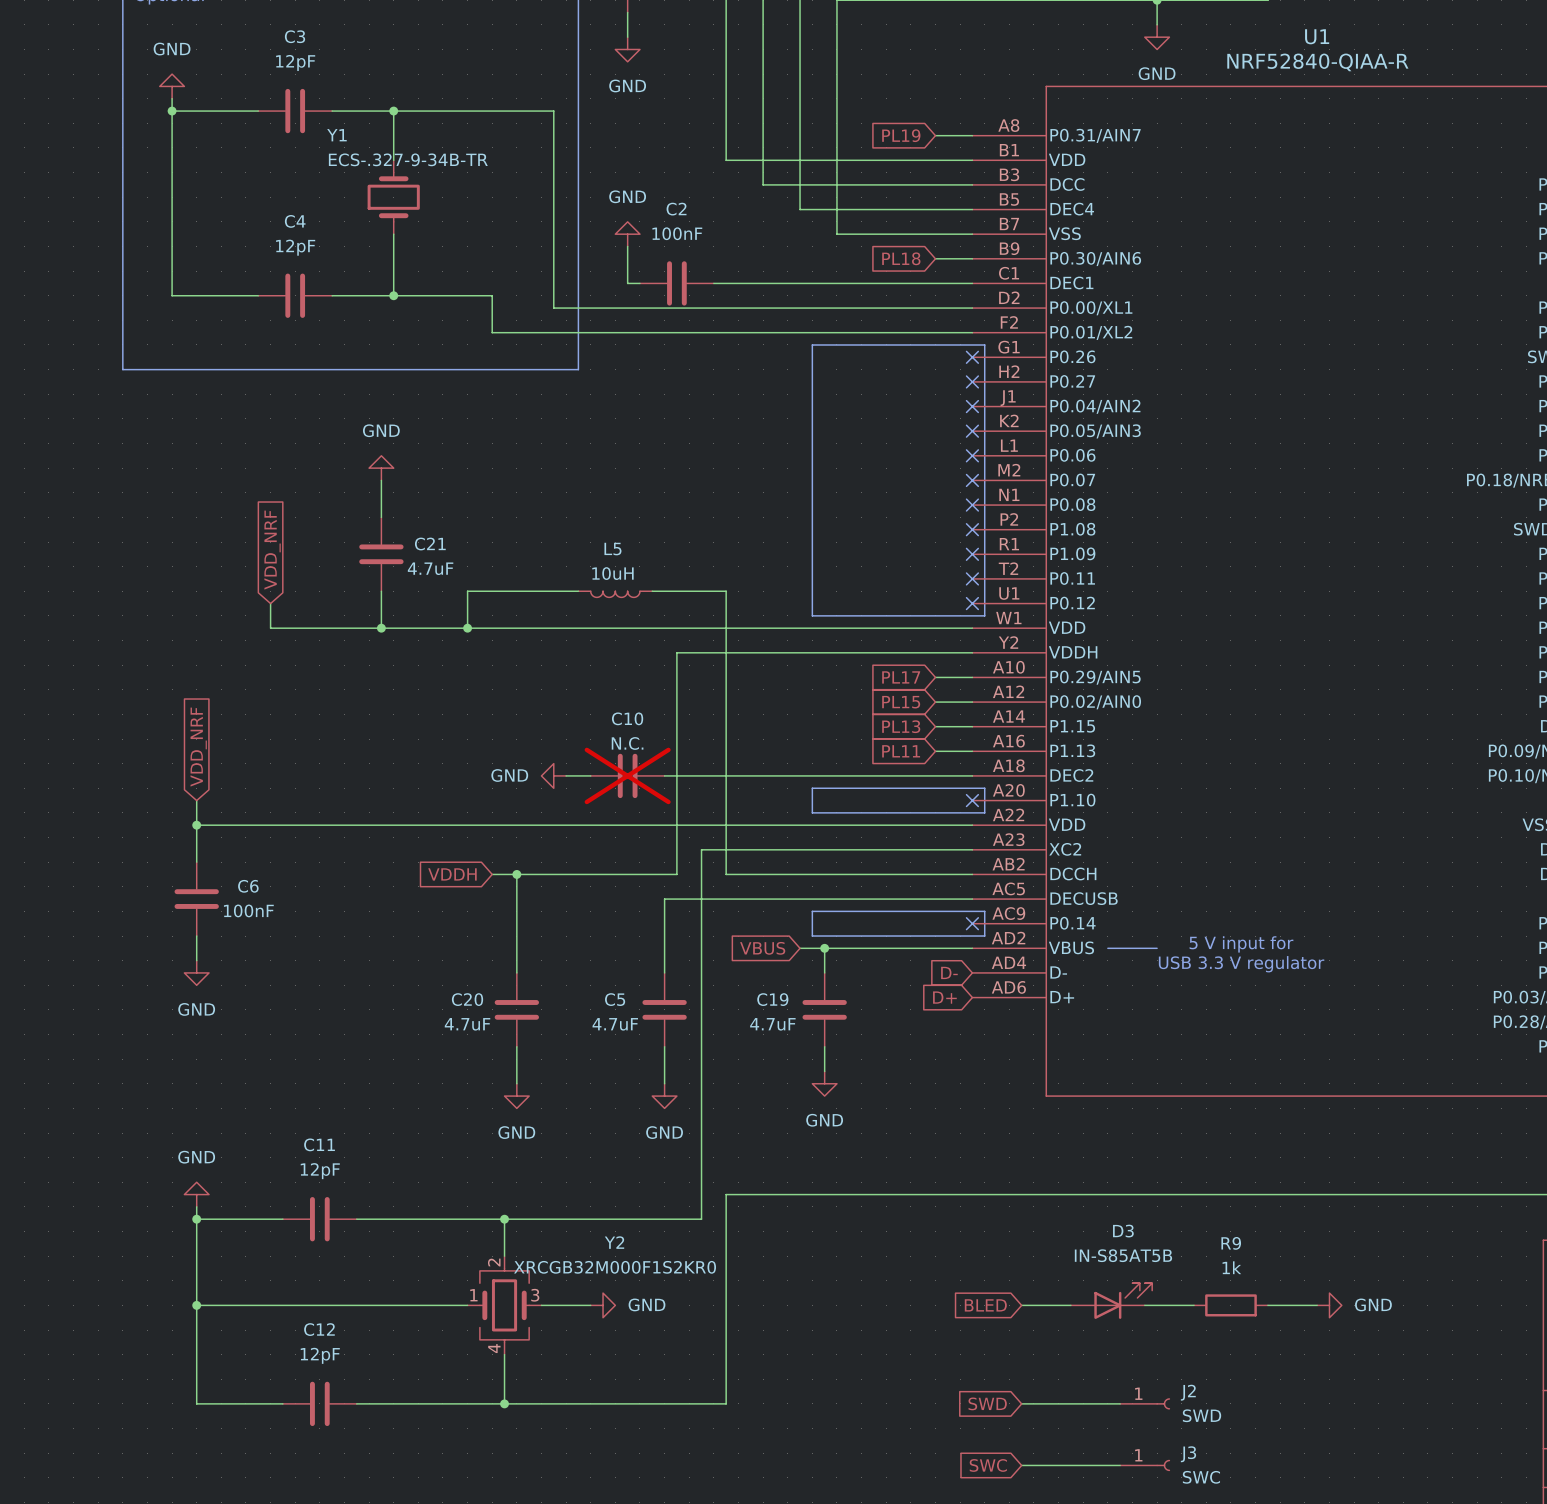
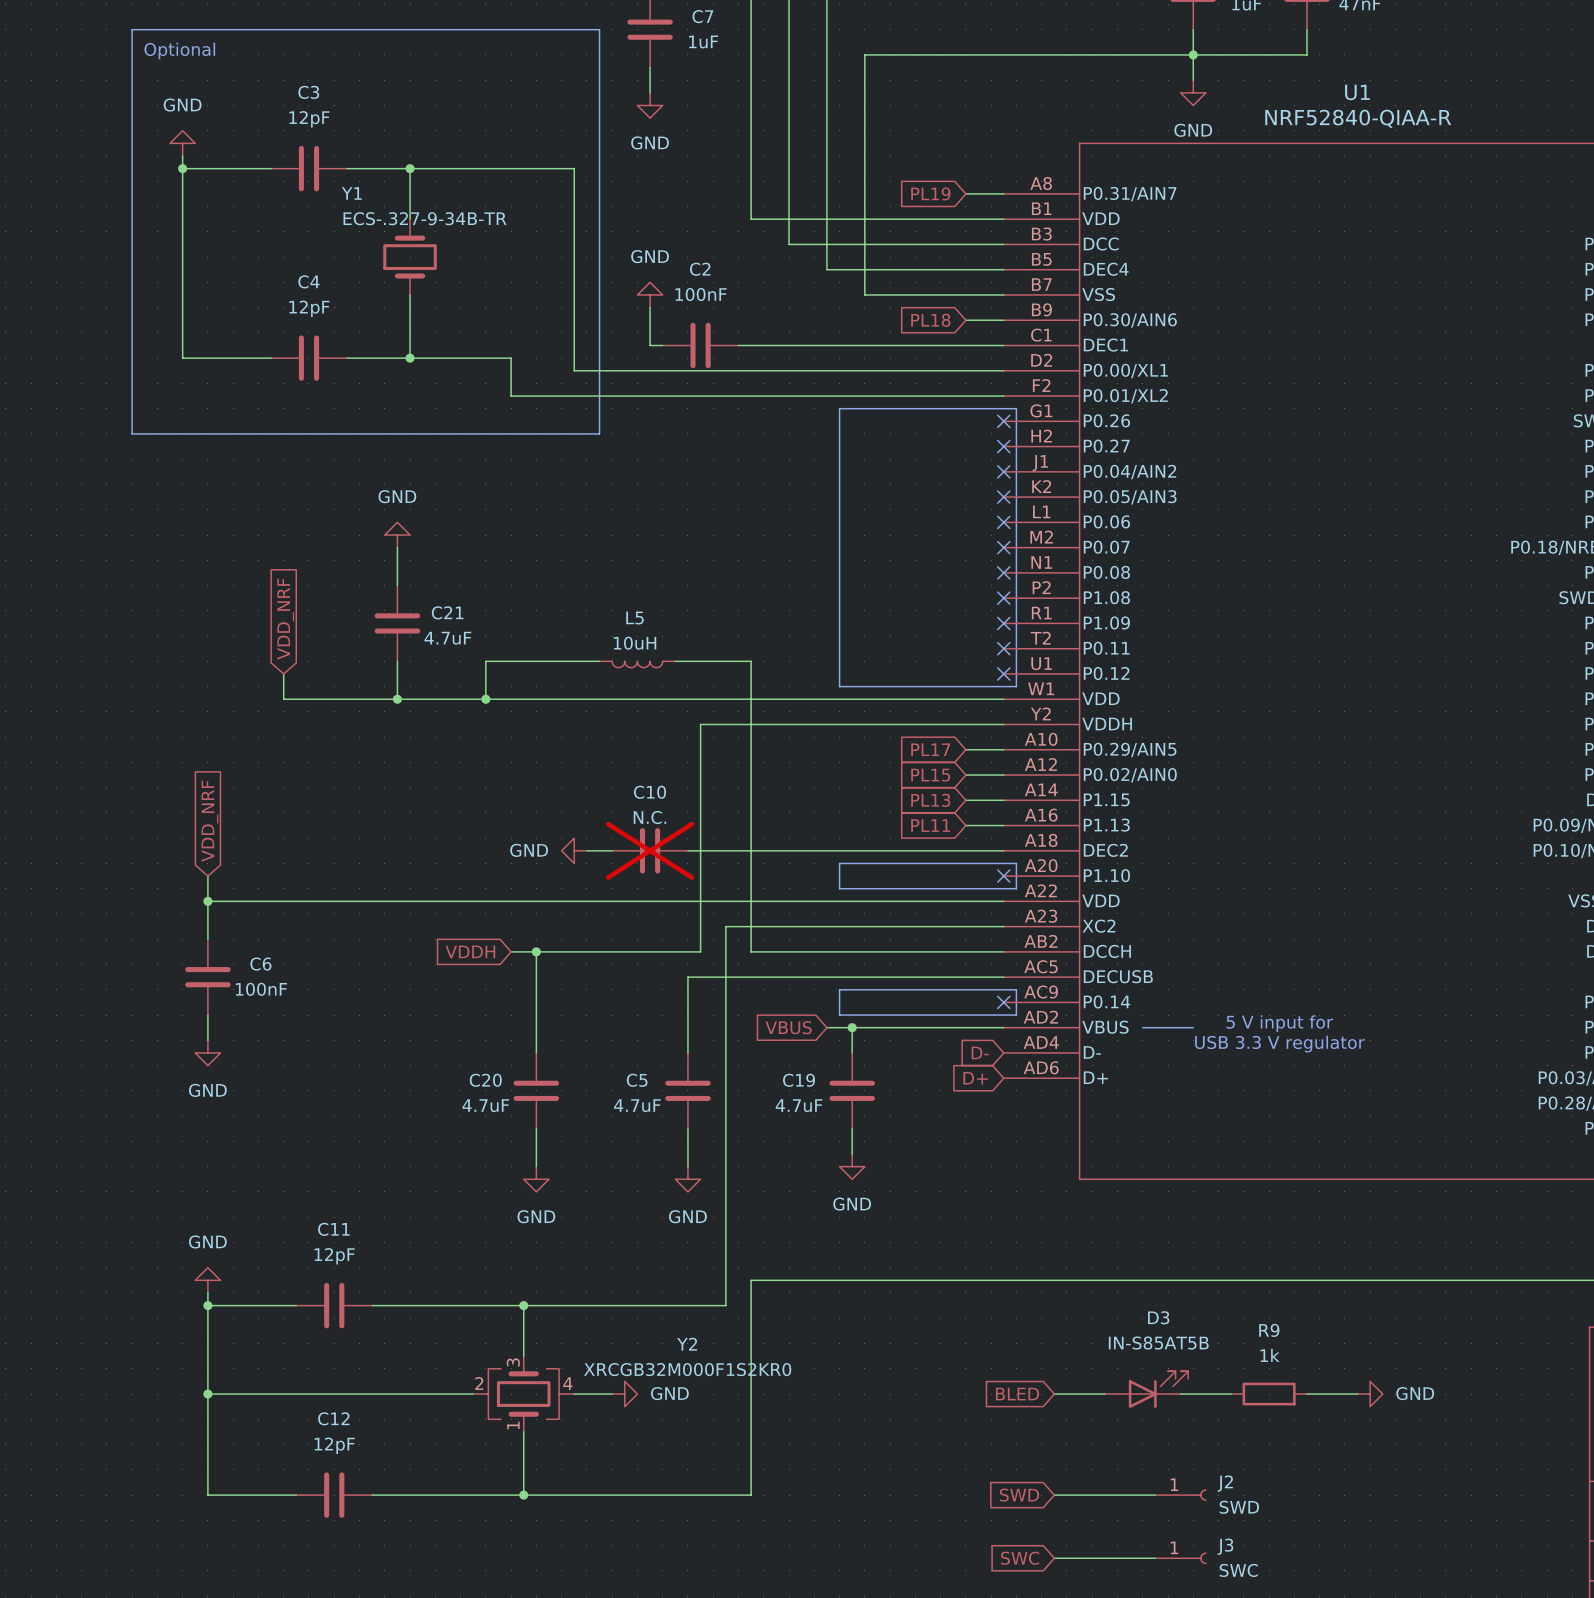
Y2 name position: Y2 (614, 1242) -> Y2 (687, 1344)
Y2 value position: XRCGB32M000F1S2KR0 (615, 1267) -> XRCGB32M000F1S2KR0 (687, 1369)
Y2 rotation: 0° (504, 1305) -> 90° counterclockwise (523, 1394)

